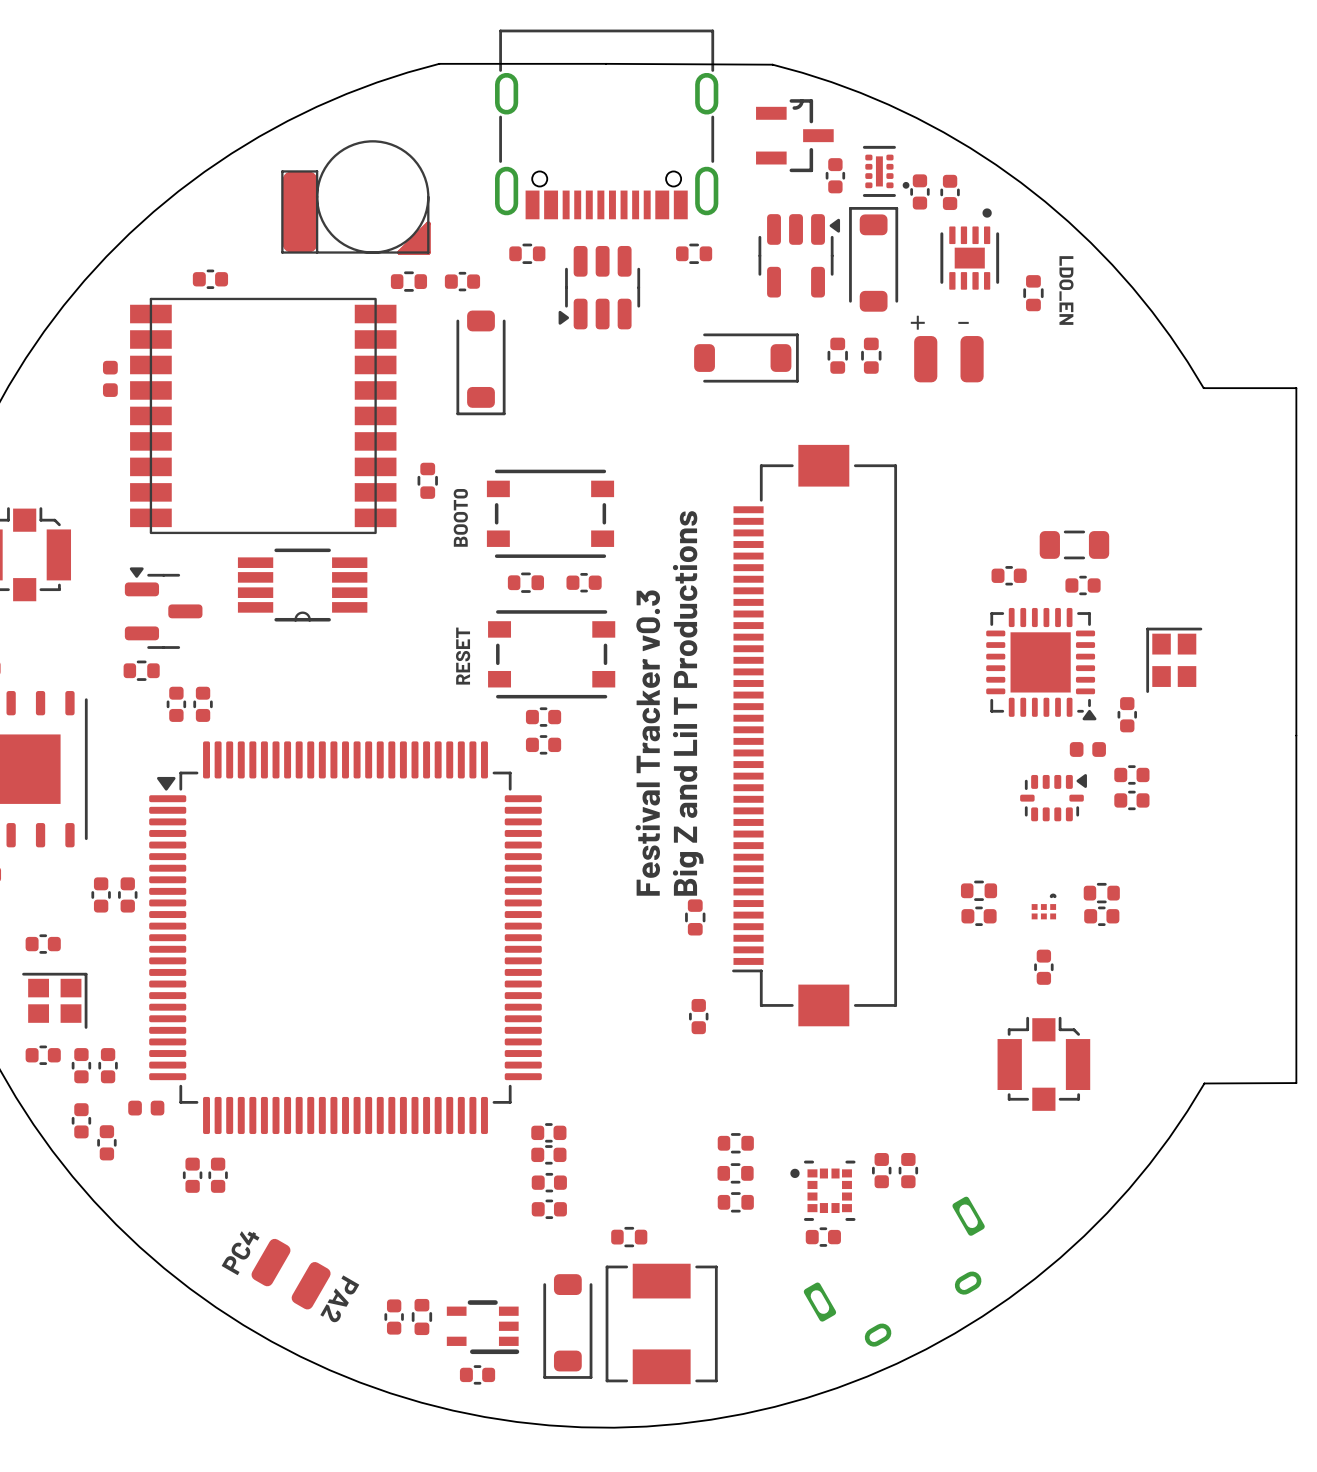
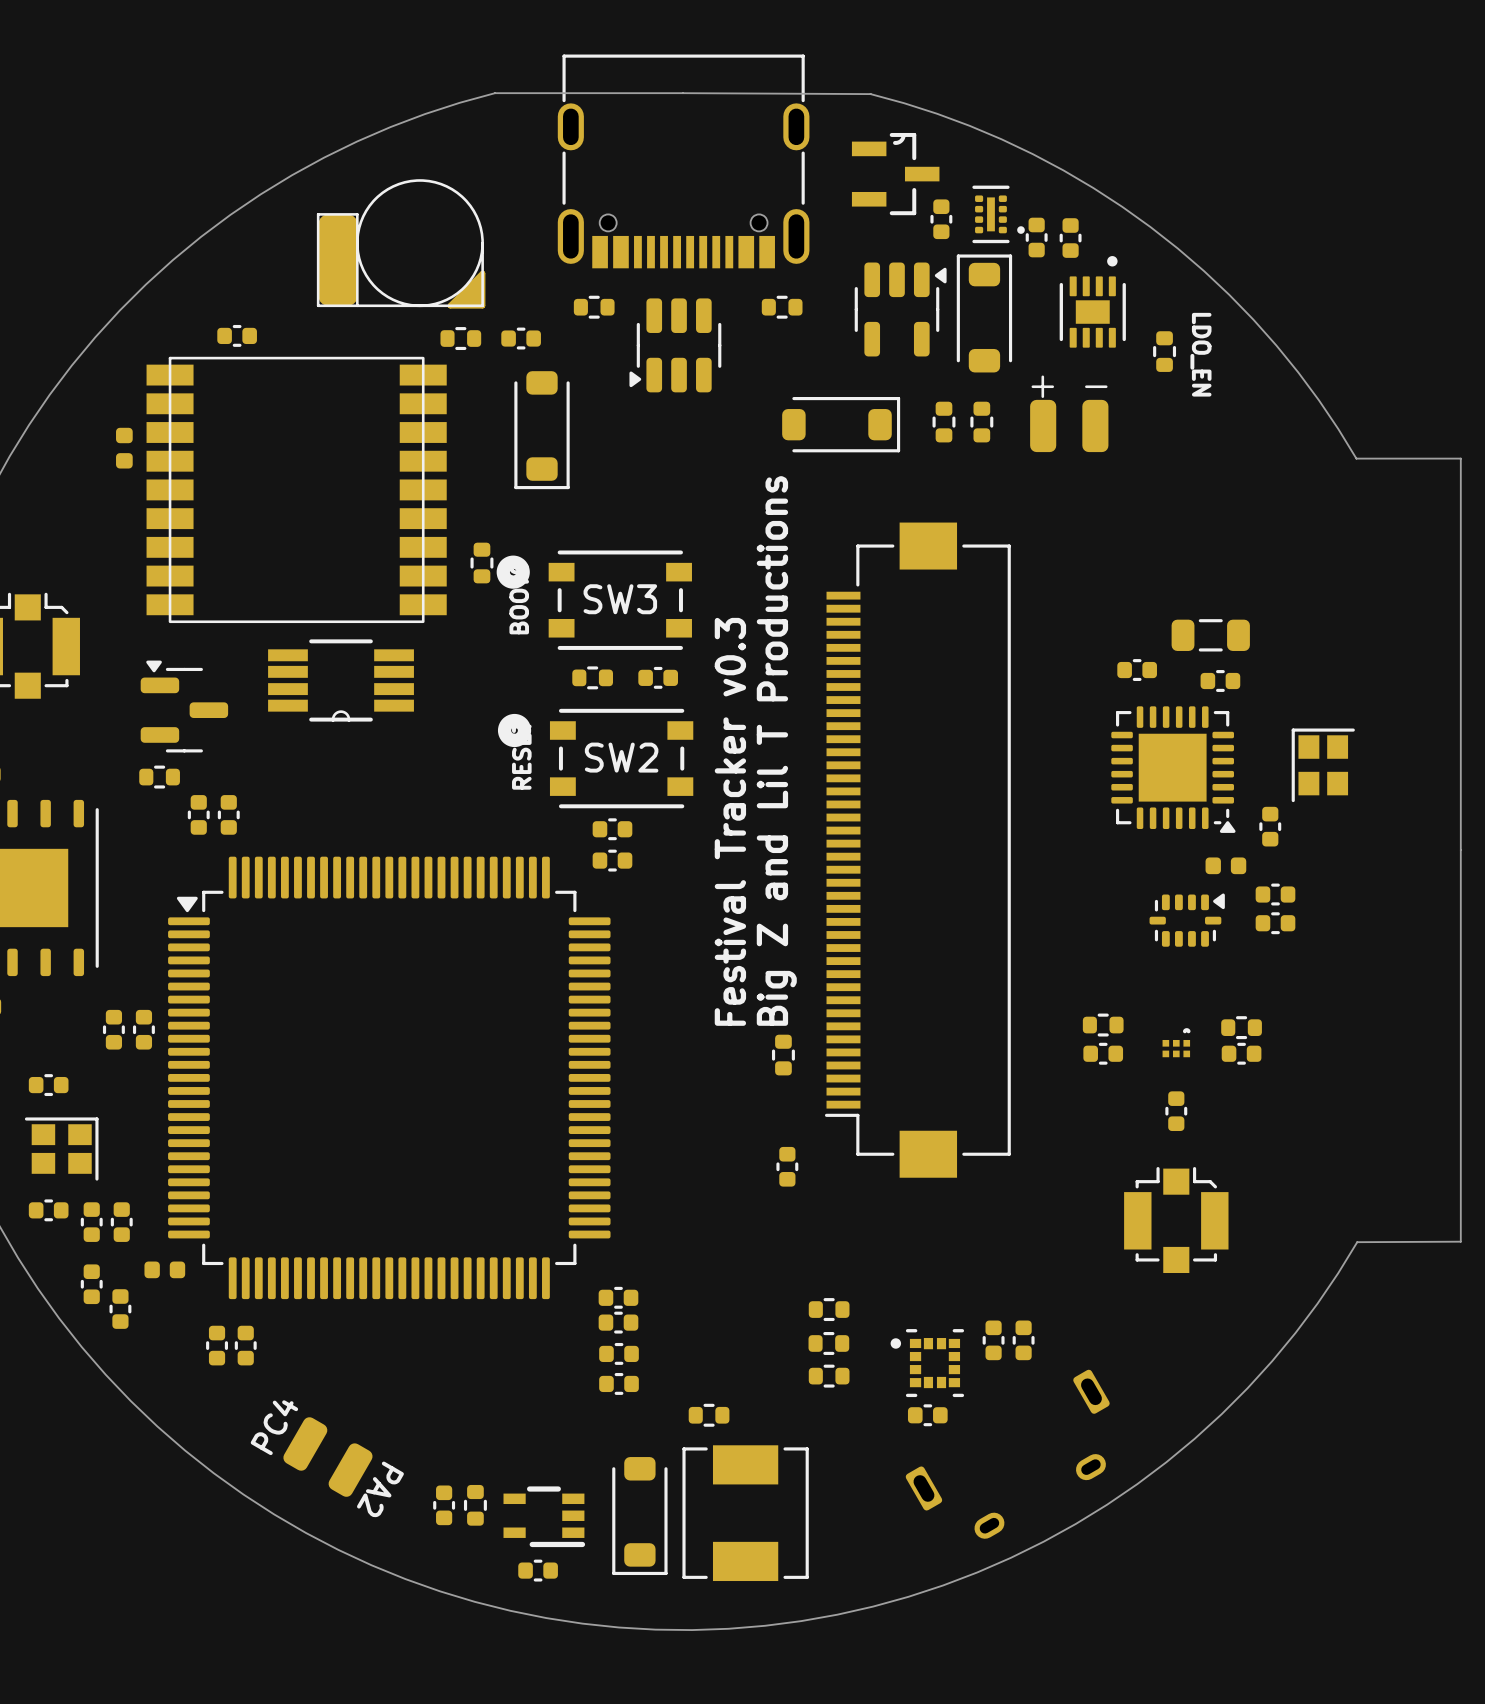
SW3: none -> (594, 600)
SW2: none -> (595, 758)

